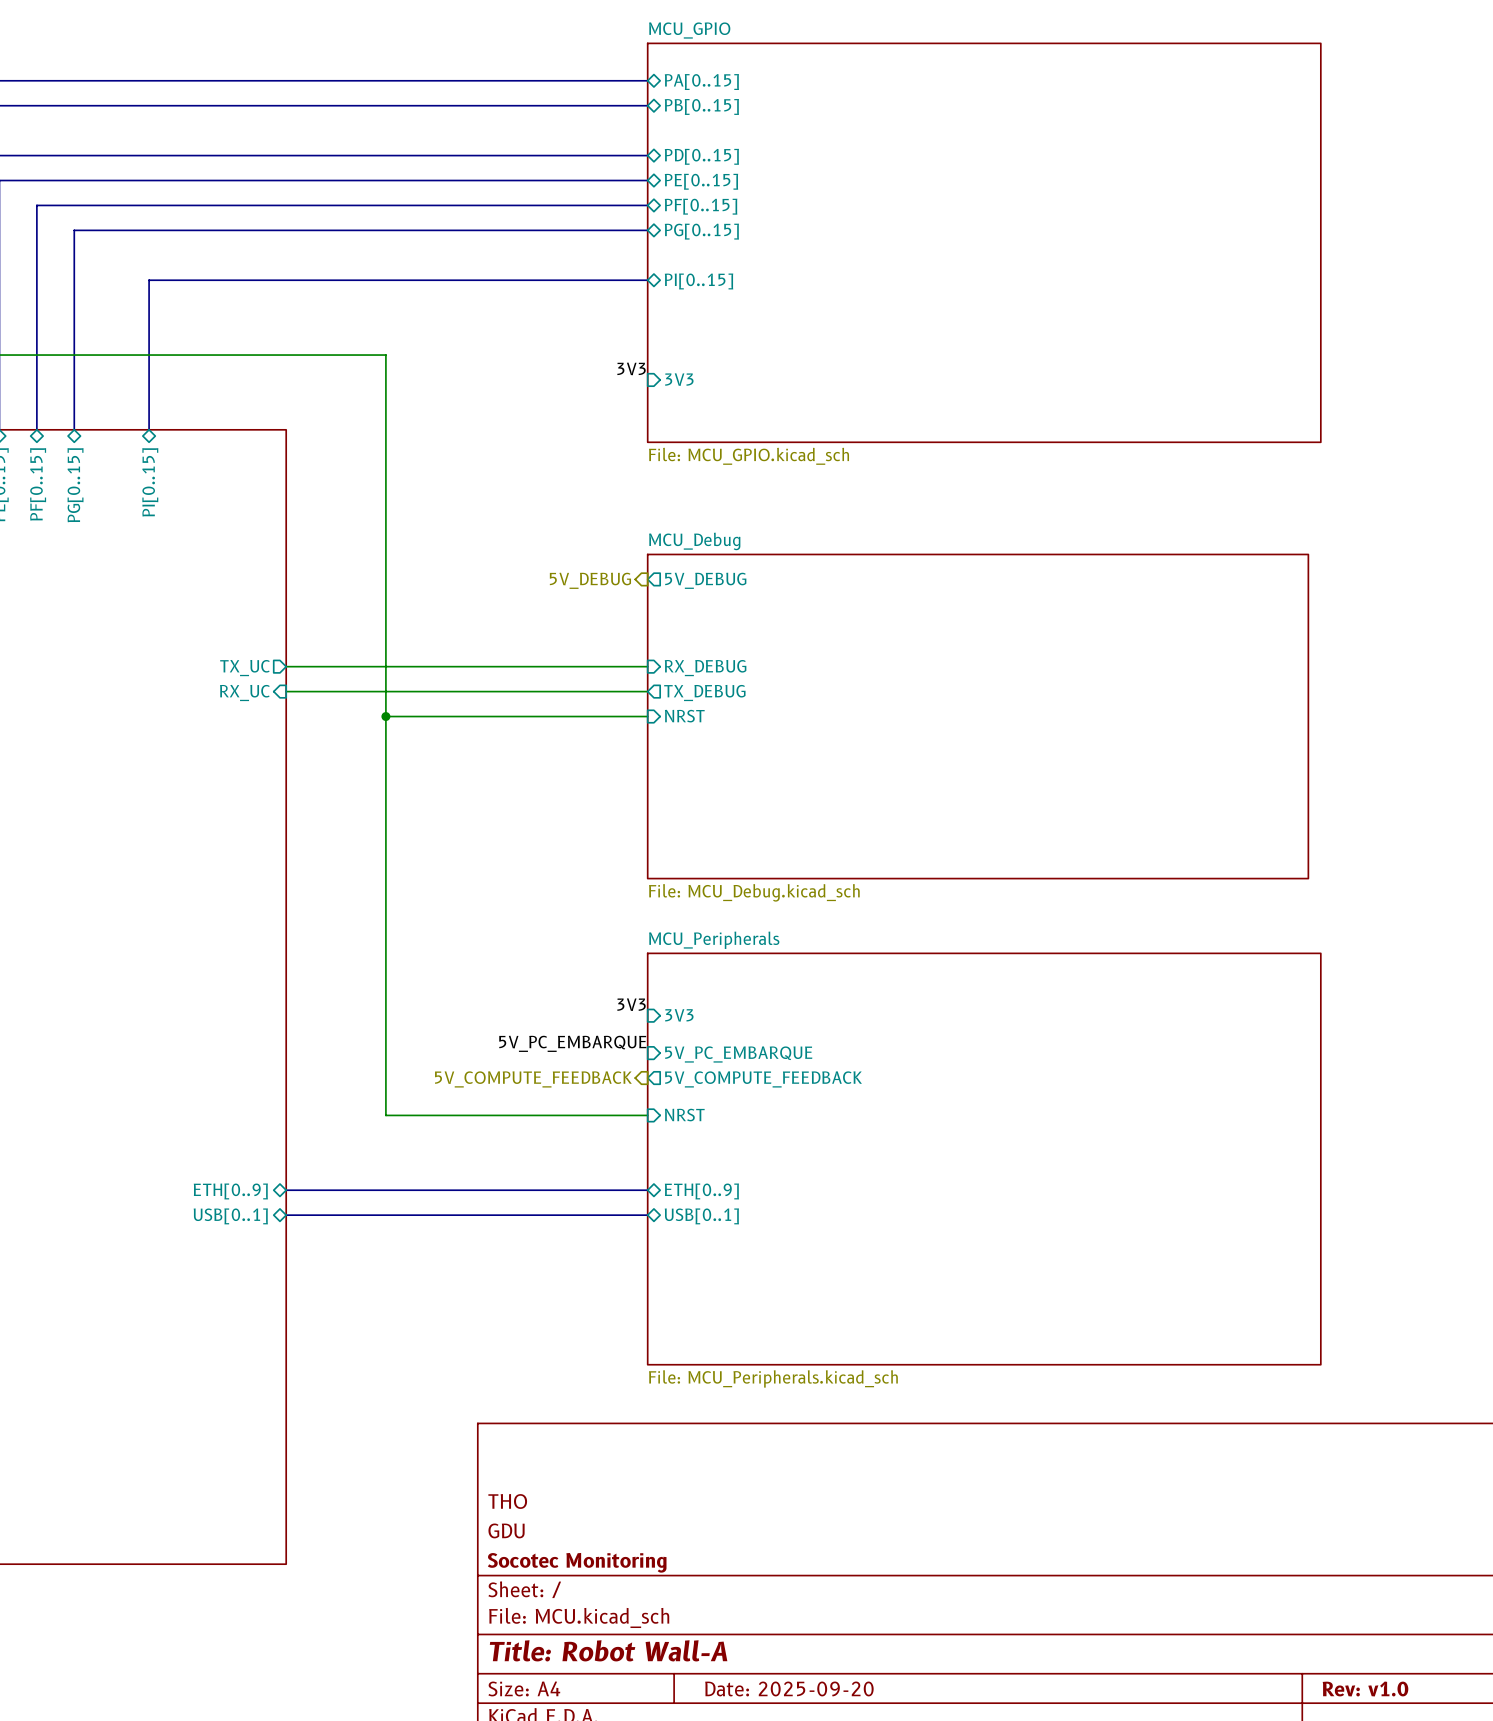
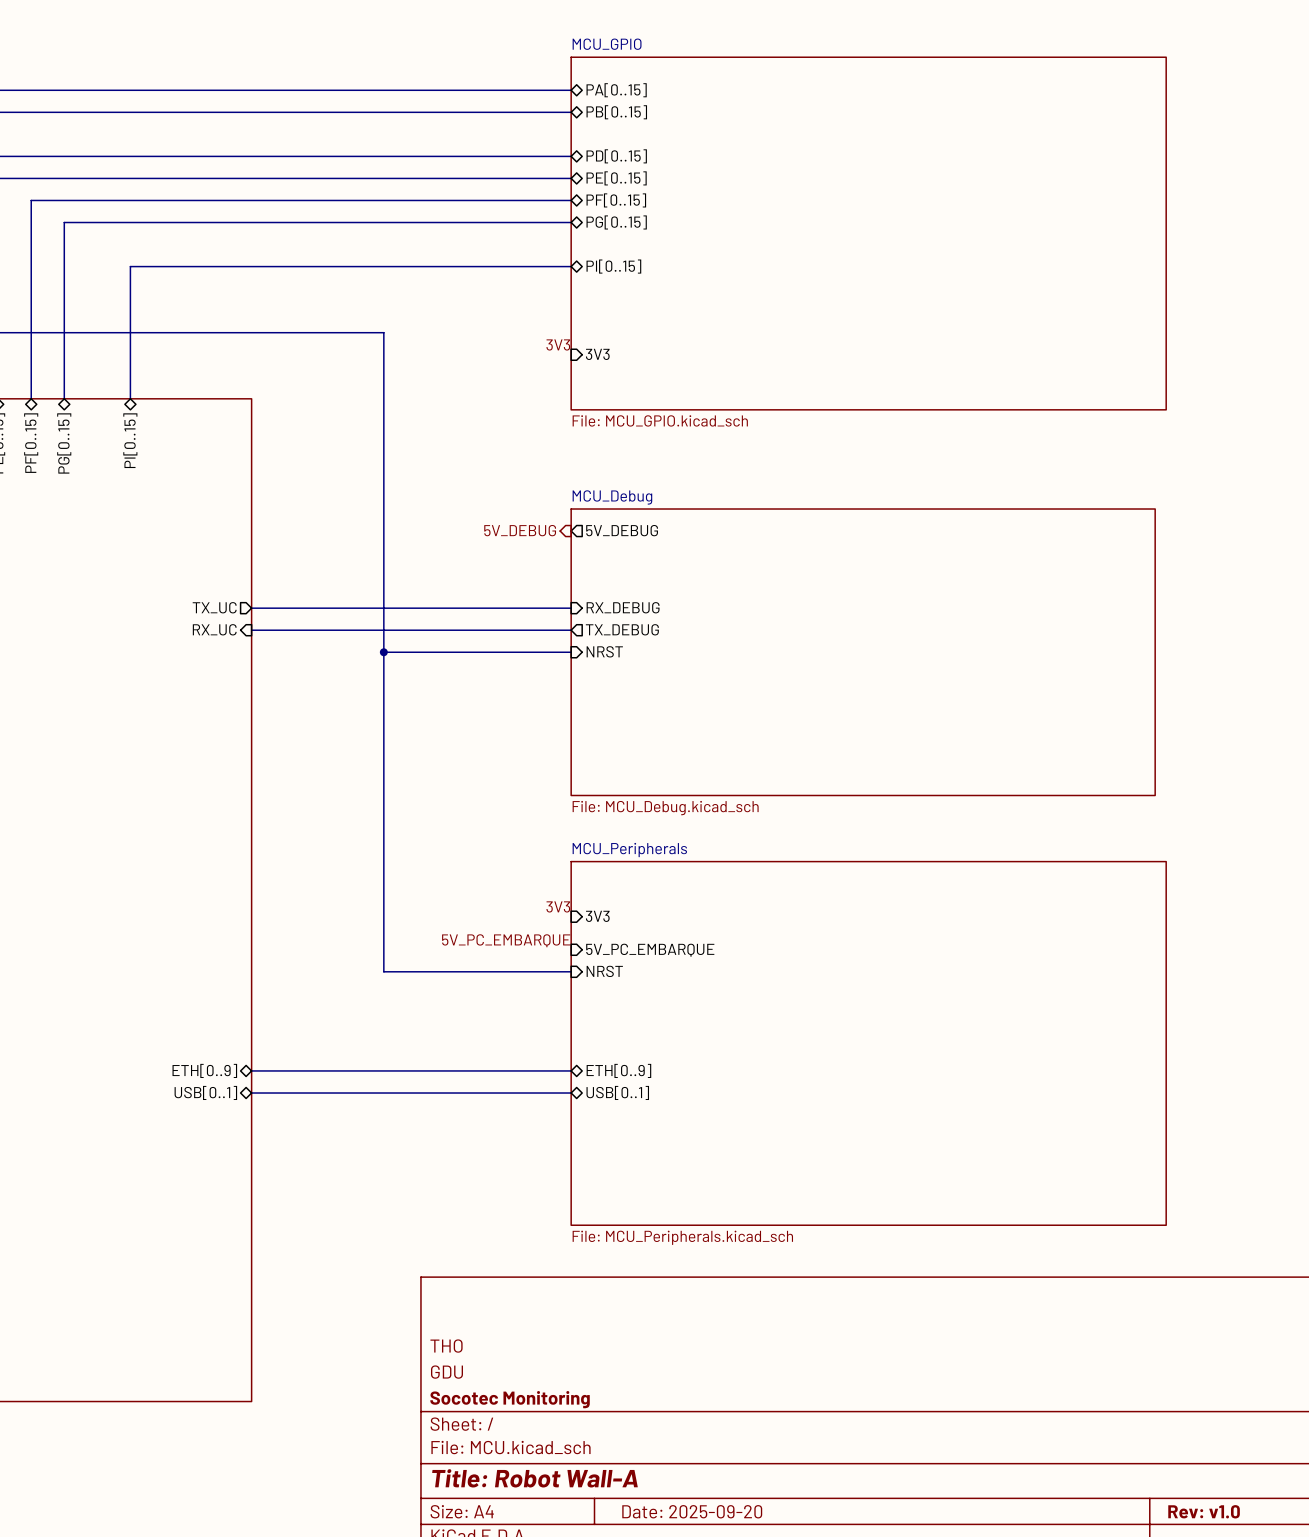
wire: (385, 355) (385, 1115) (647, 1115) -> (339, 332) (383, 332) (383, 971) (571, 971)
wire: (385, 716) (435, 716) -> none
junction position: (385, 716) -> (383, 652)
hierarchical label: 5V_COMPUTE_FEEDBACK (533, 1079) -> none
sheet pin shape: output (763, 1079) -> input (604, 971)
sheet pin: 5V_COMPUTE_FEEDBACK (763, 1079) -> NRST (604, 971)
sheet pin: NRST (684, 1115) -> none

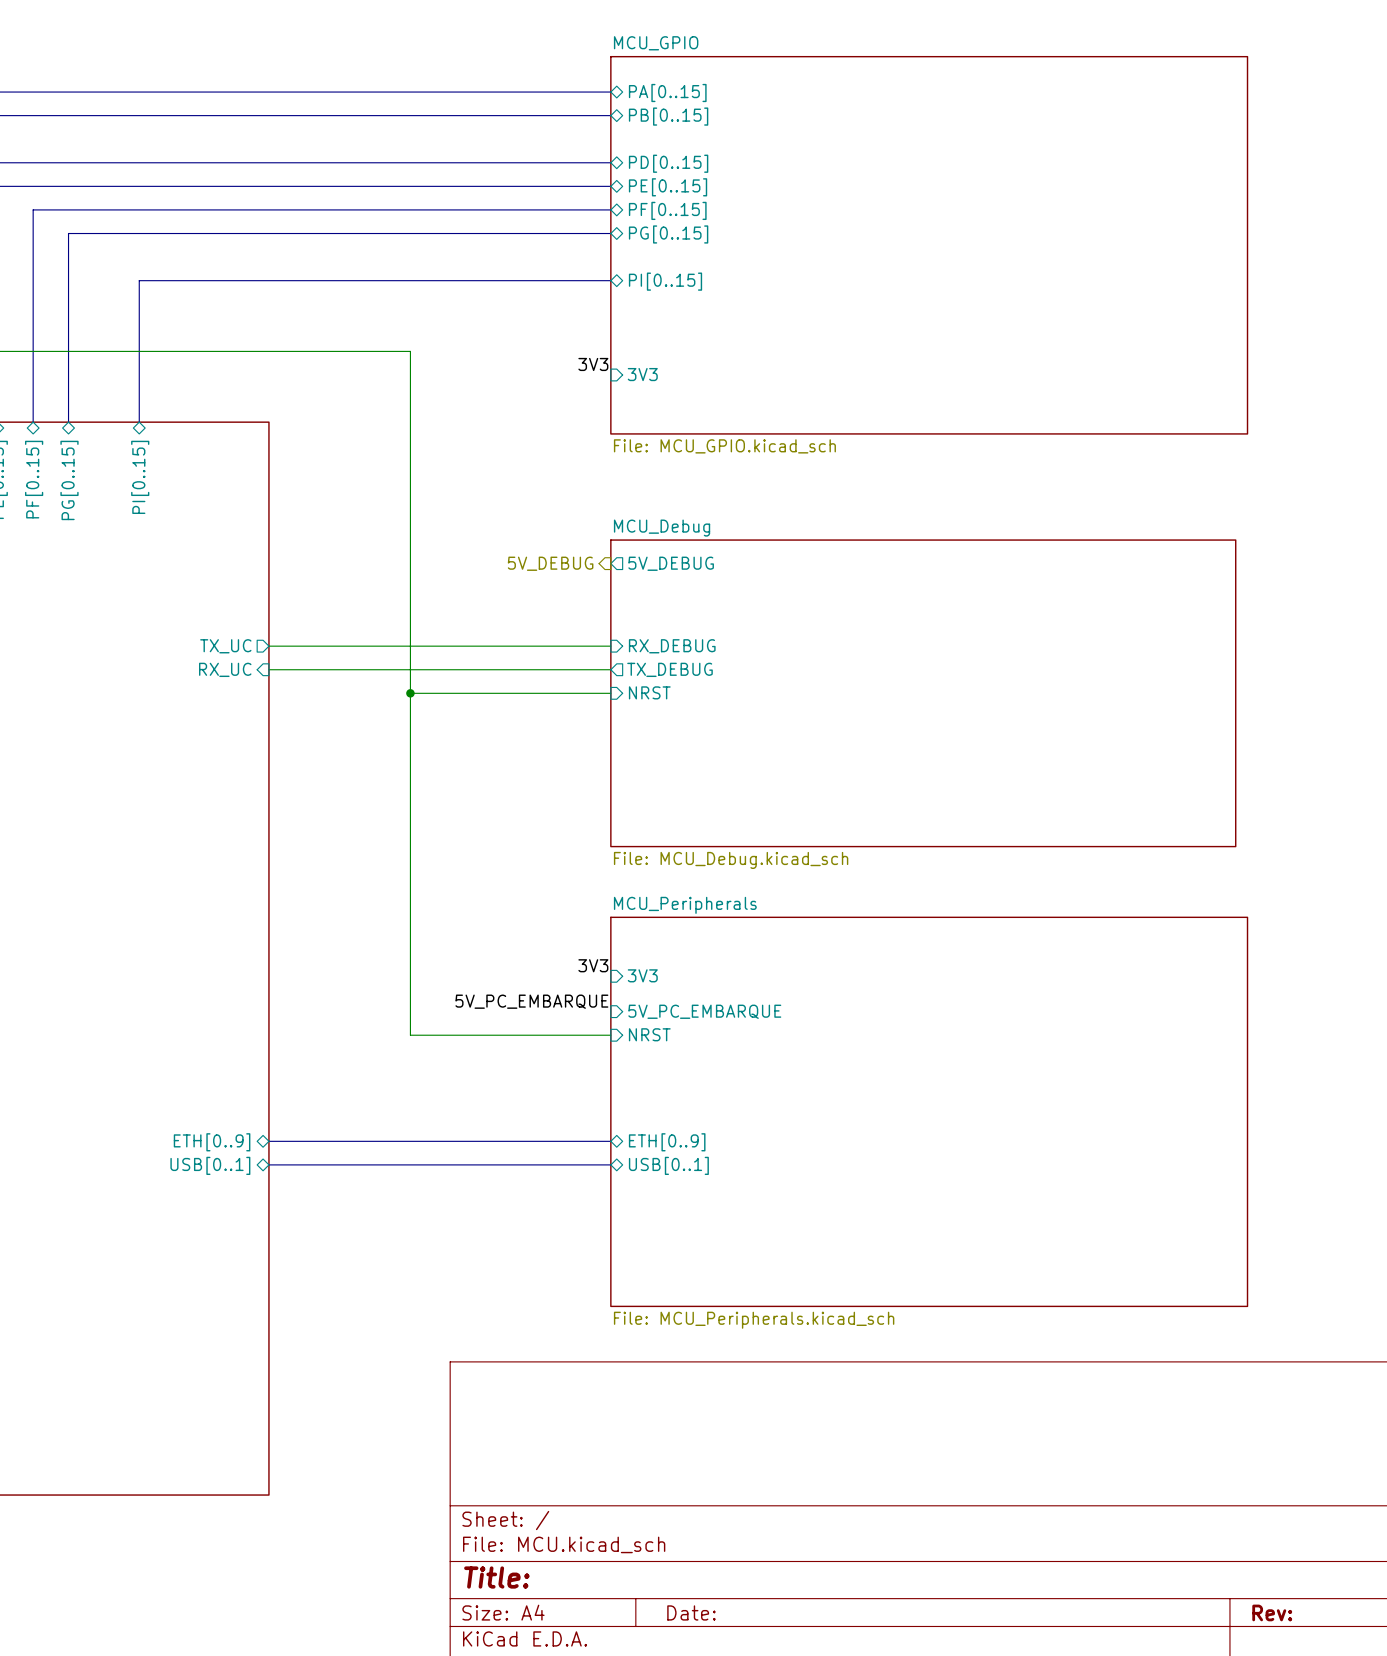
title block: THO (446, 1346) -> none
title block: GDU (446, 1372) -> none
title block: Socotec Monitoring (510, 1399) -> none
title block: Title: Robot Wall-A (534, 1478) -> Title: (496, 1577)
title block: Date: 2025-09-20 (692, 1511) -> Date: (691, 1612)
title block: Rev: v1.0 (1204, 1511) -> Rev: (1272, 1612)

